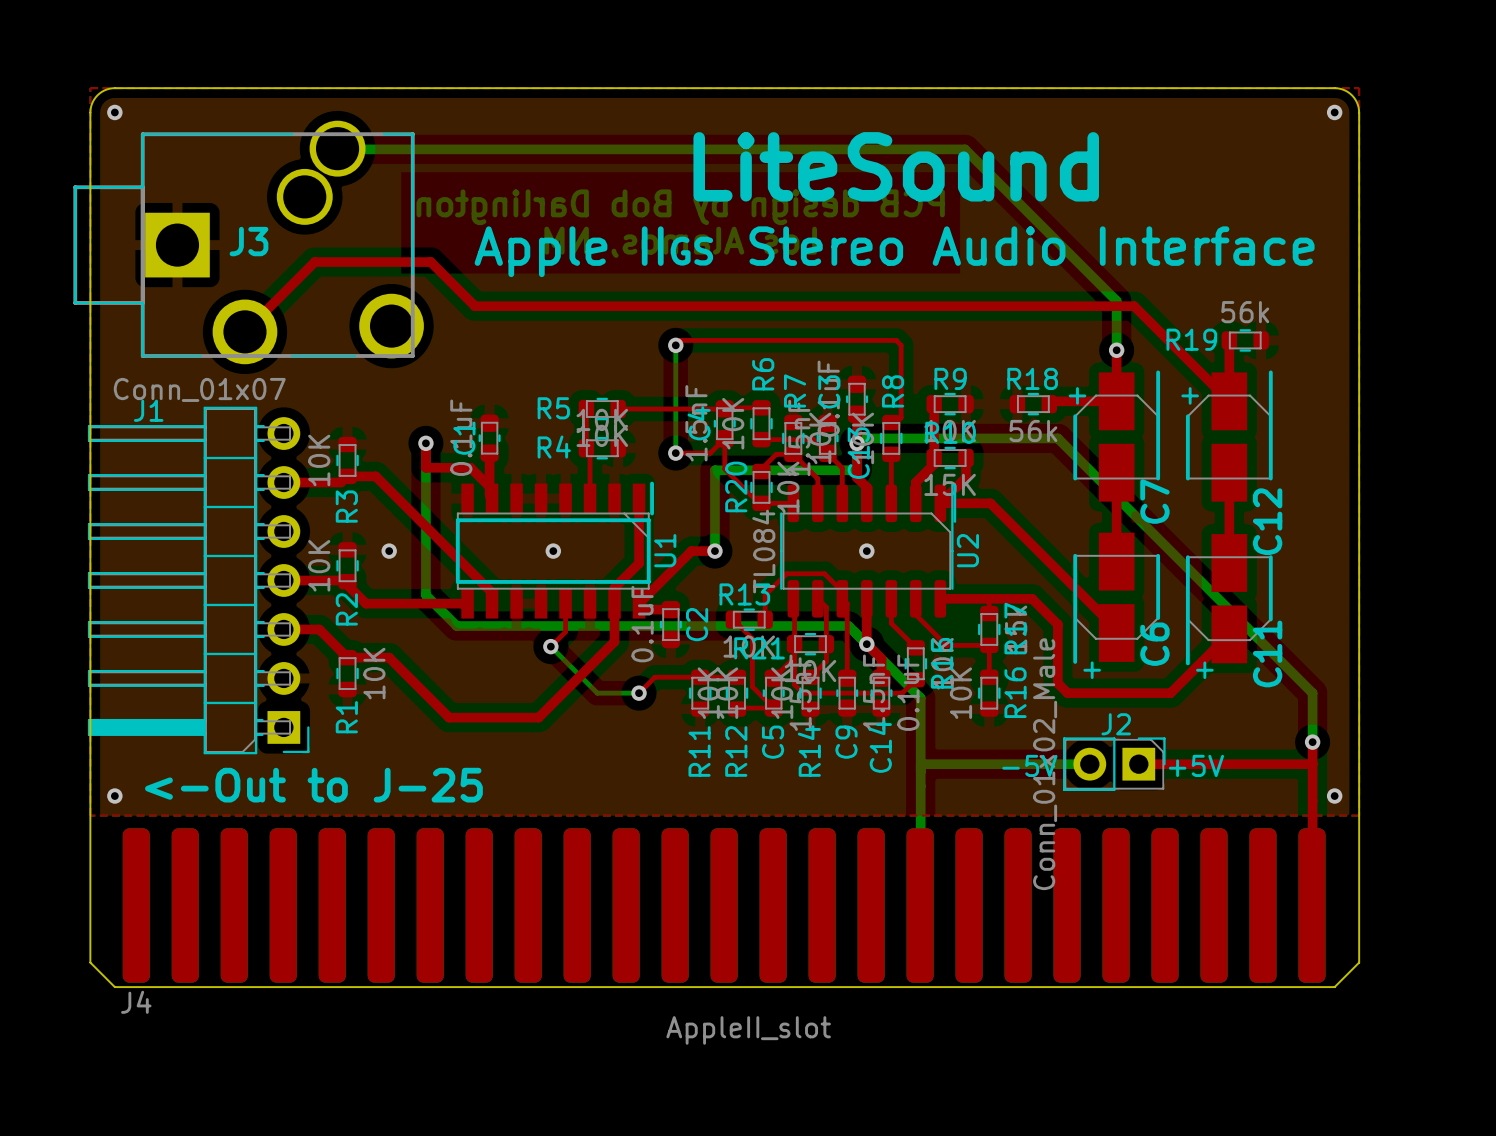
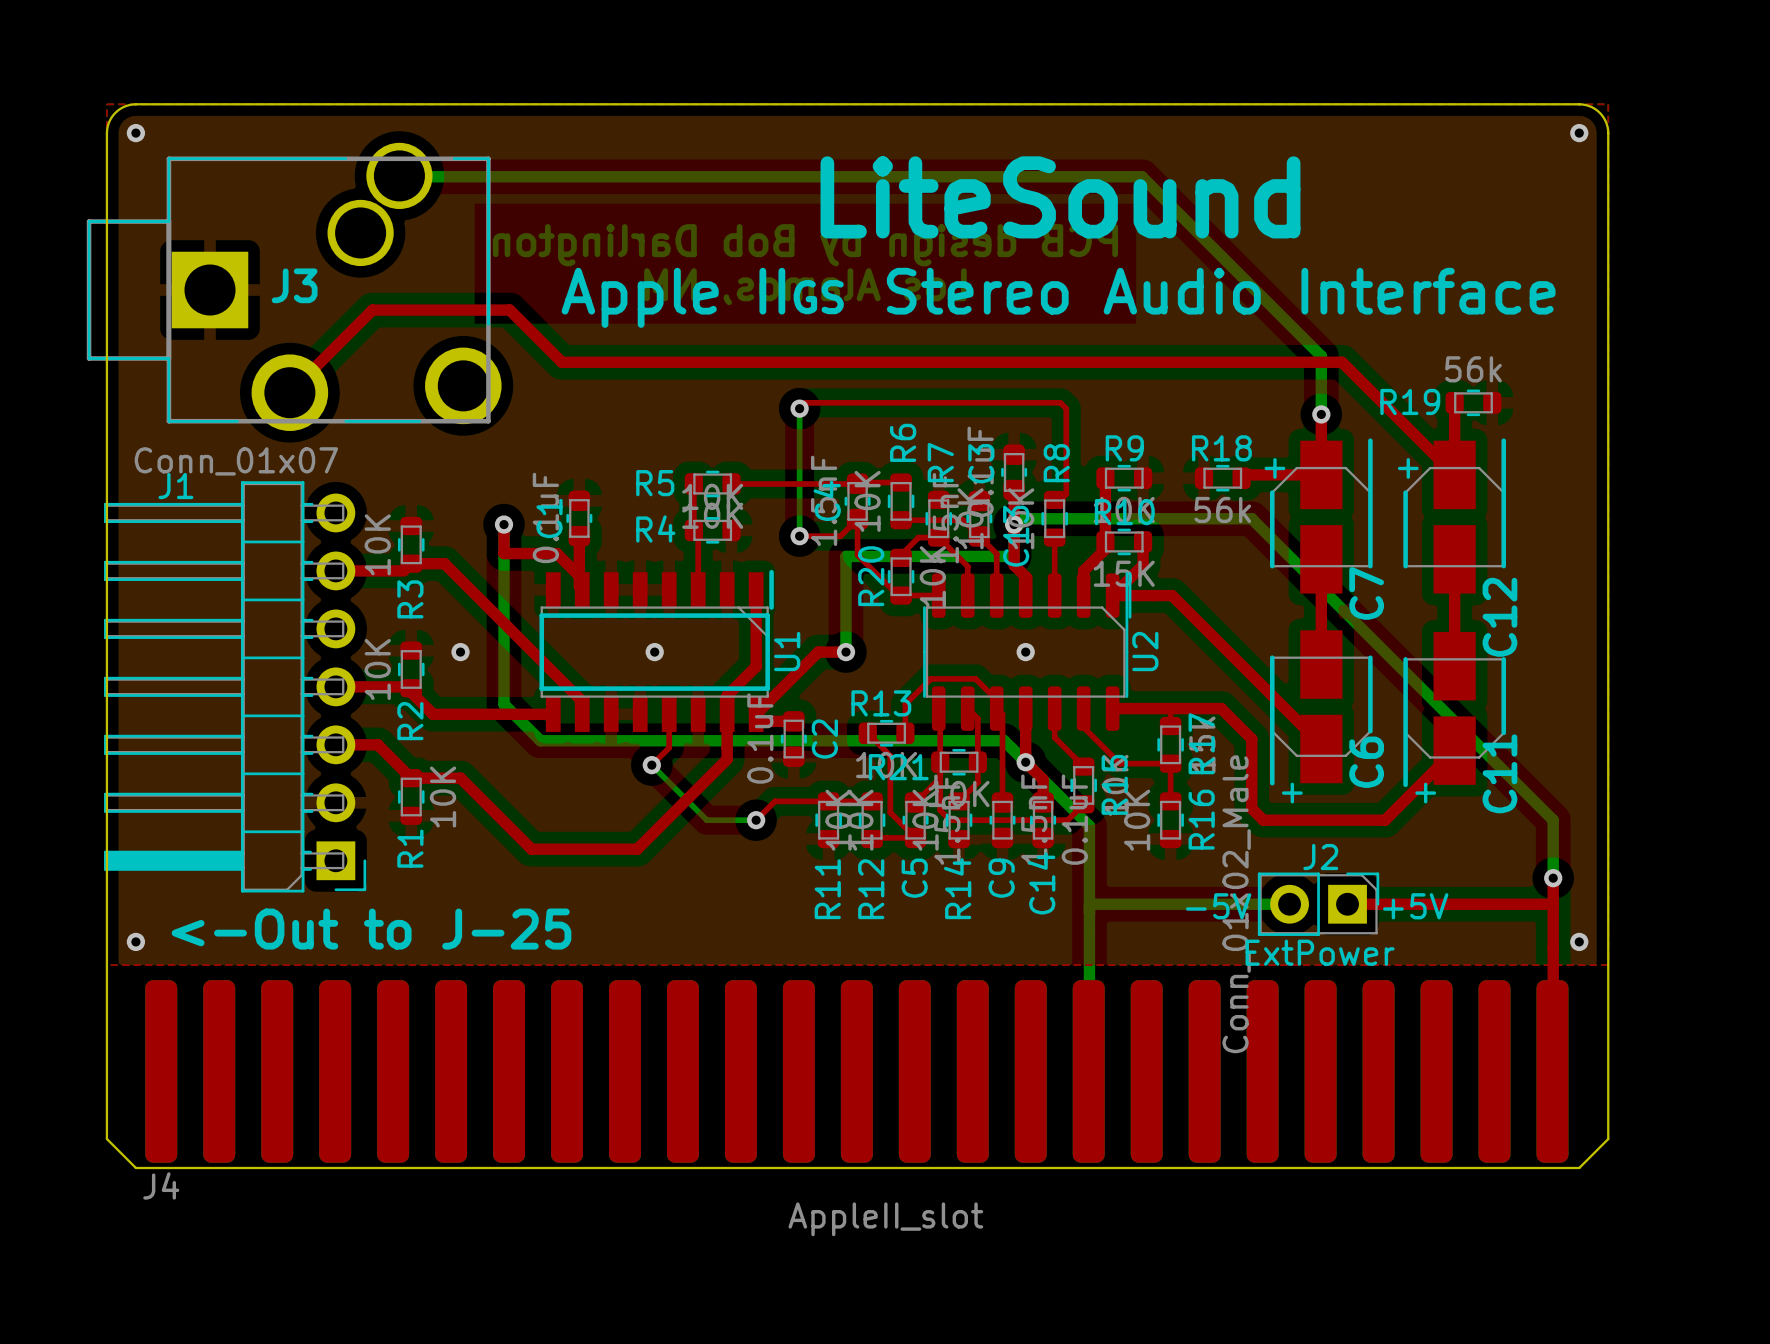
U2 value: TL084 (763, 551) -> none
text: none -> ExtPower (1320, 952)

